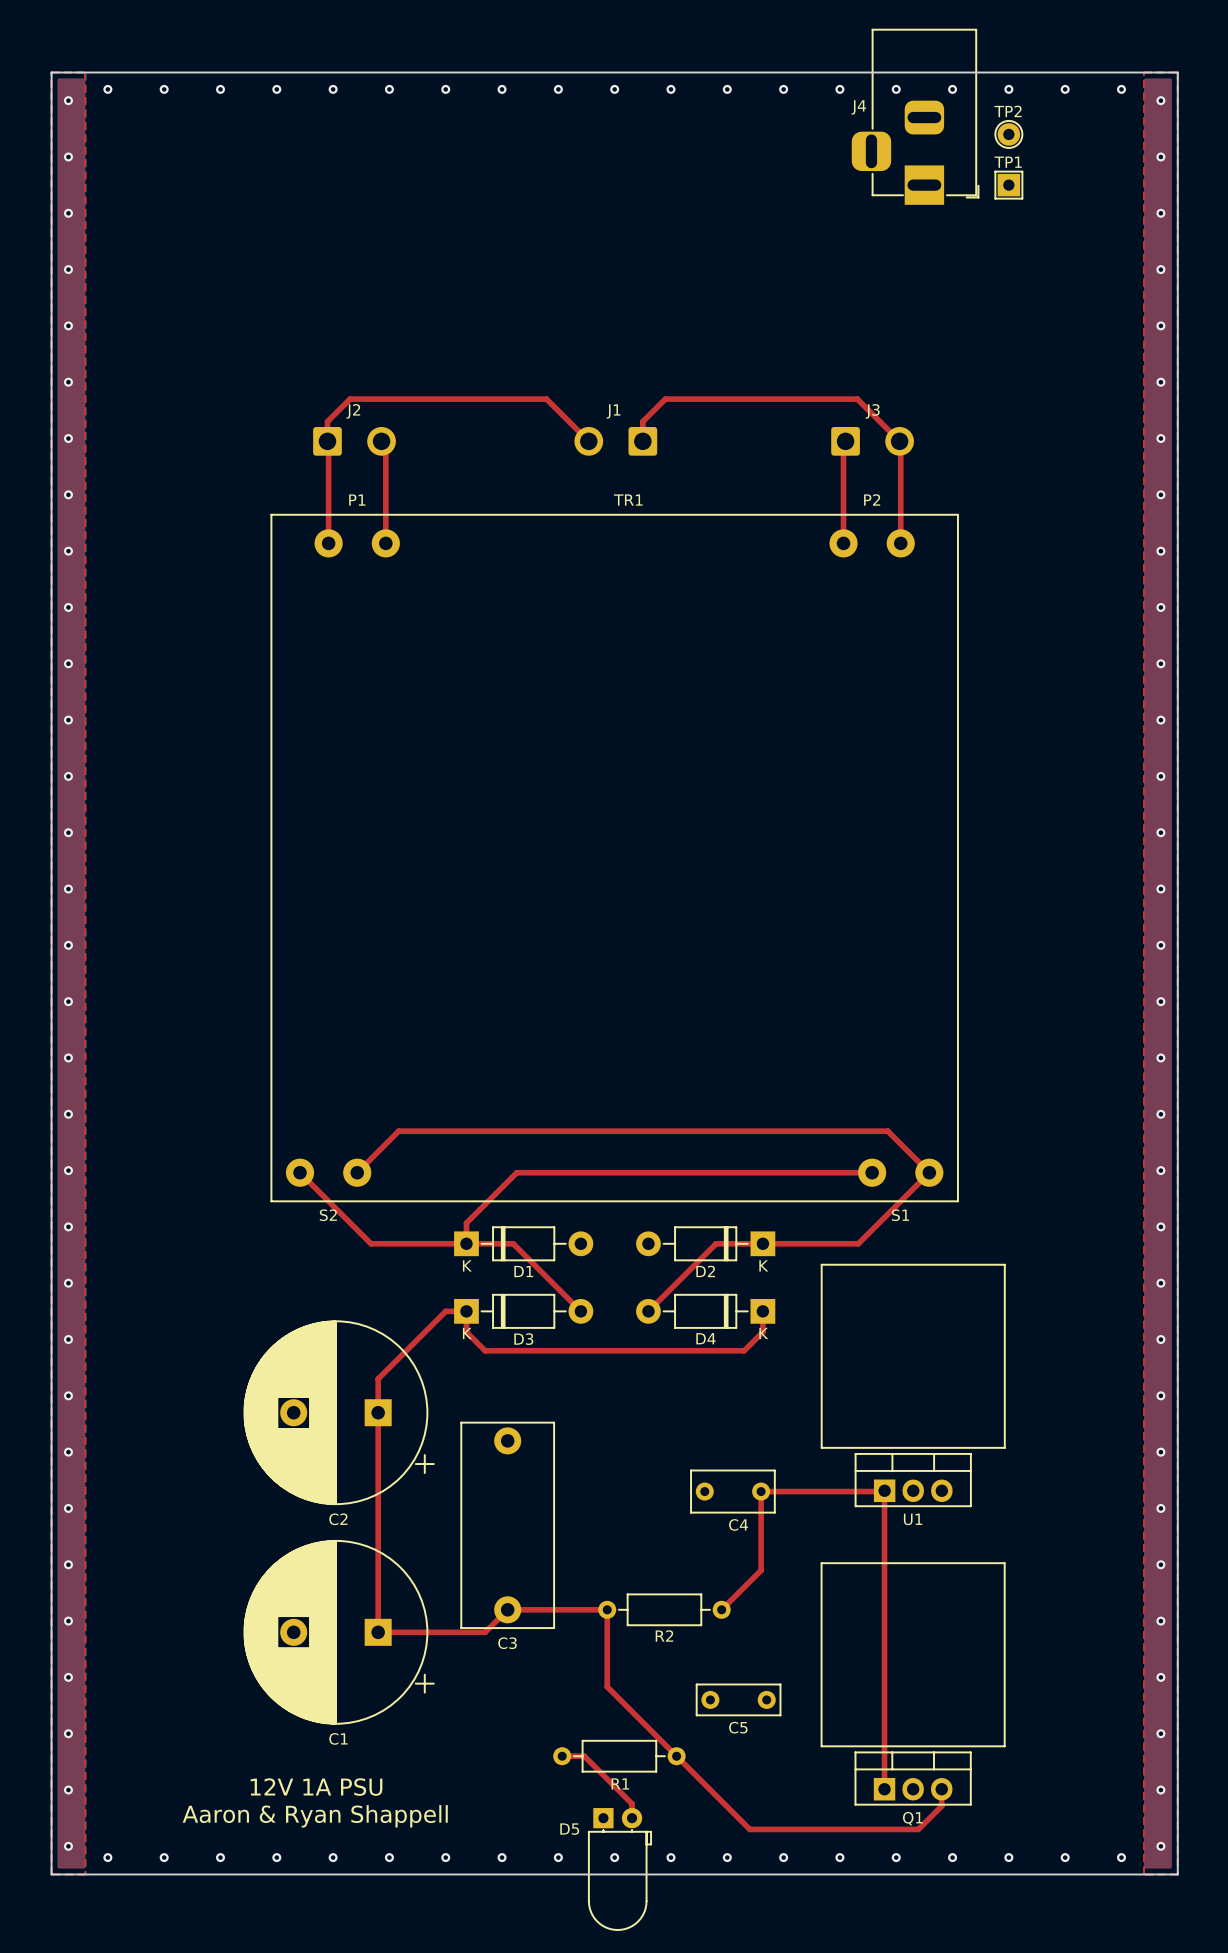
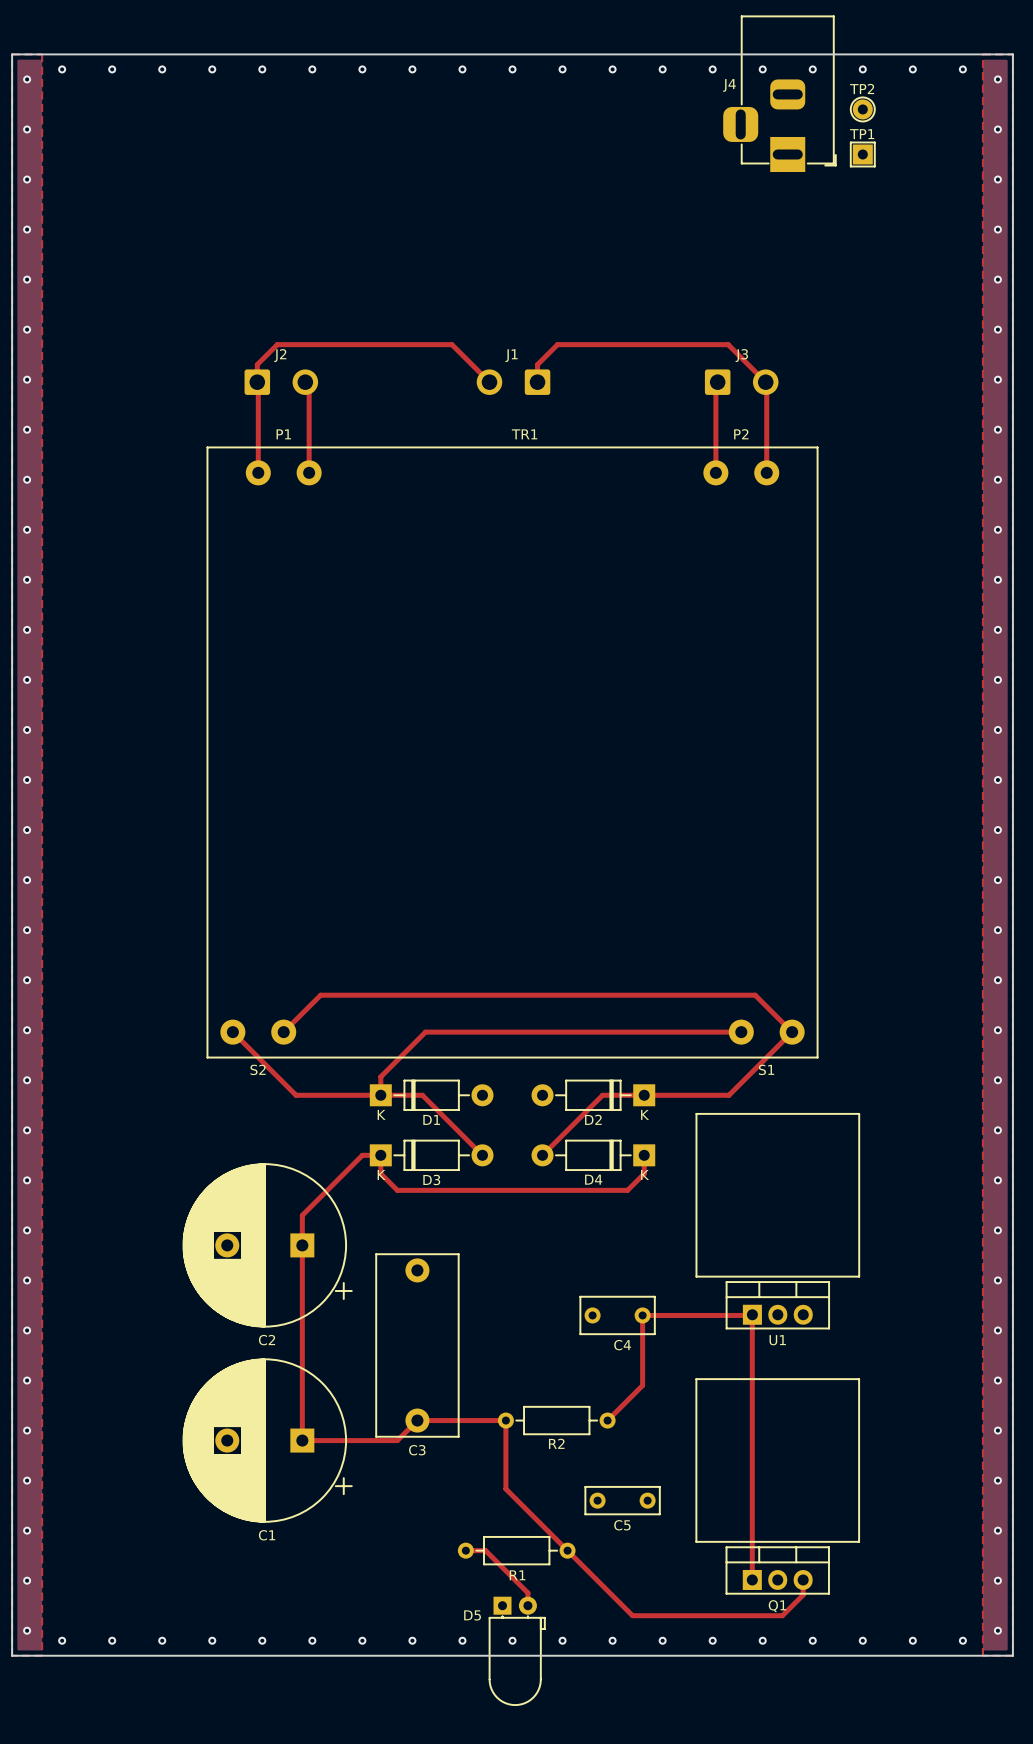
text: 12V 1A PSU (316, 1787) -> none
text: Aaron & Ryan Shappell (315, 1816) -> none

